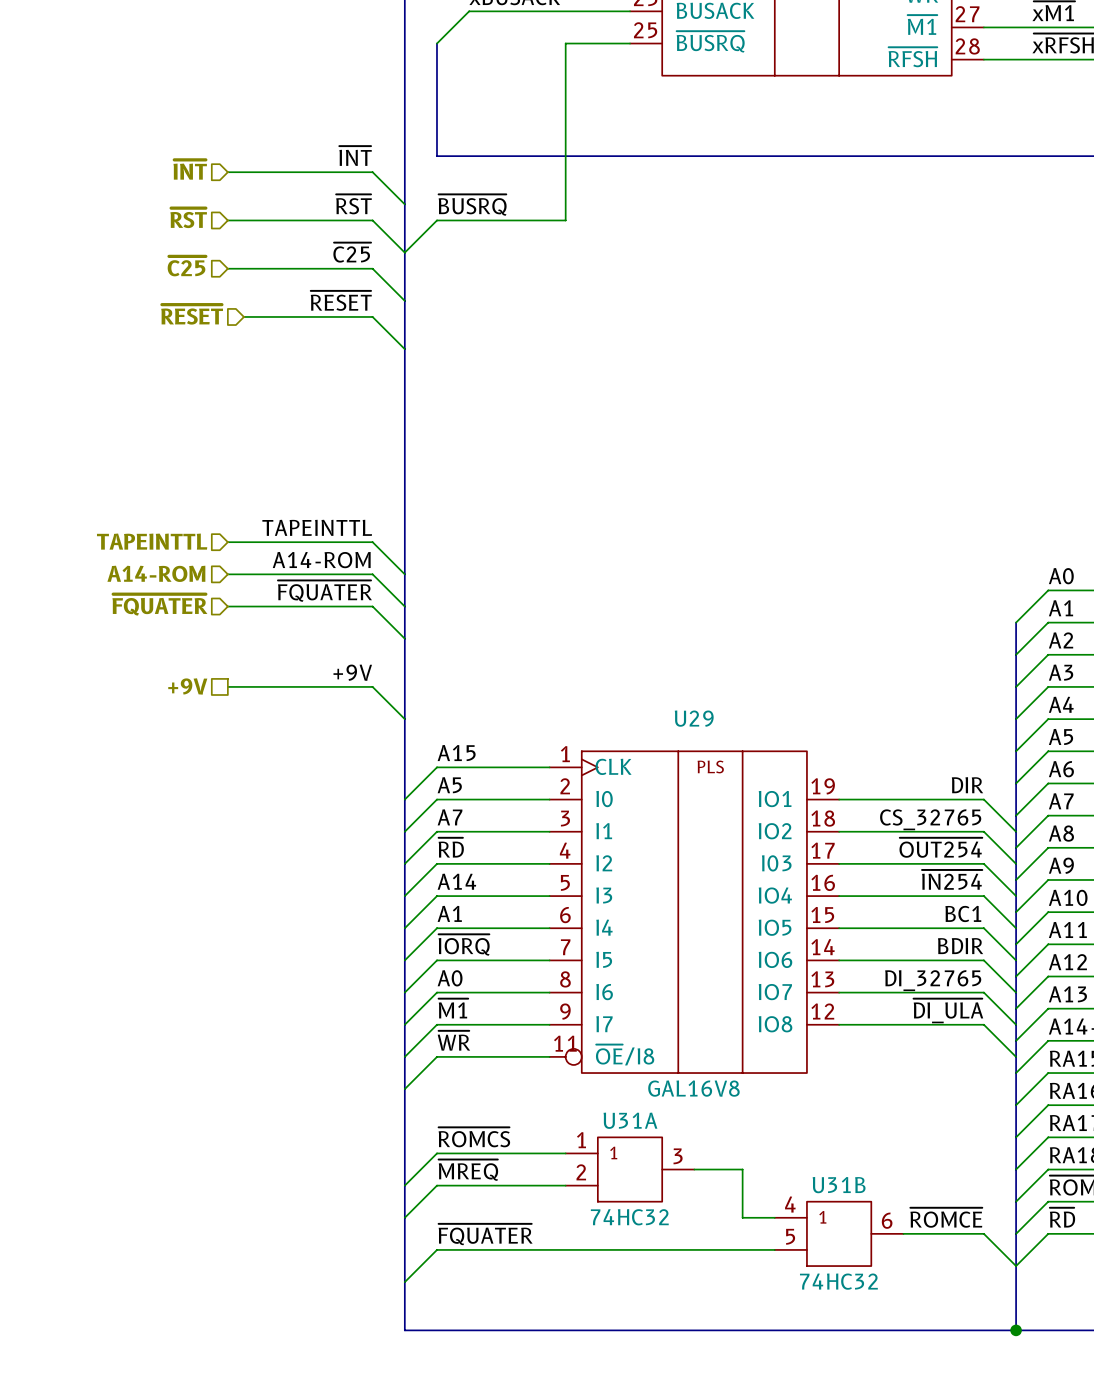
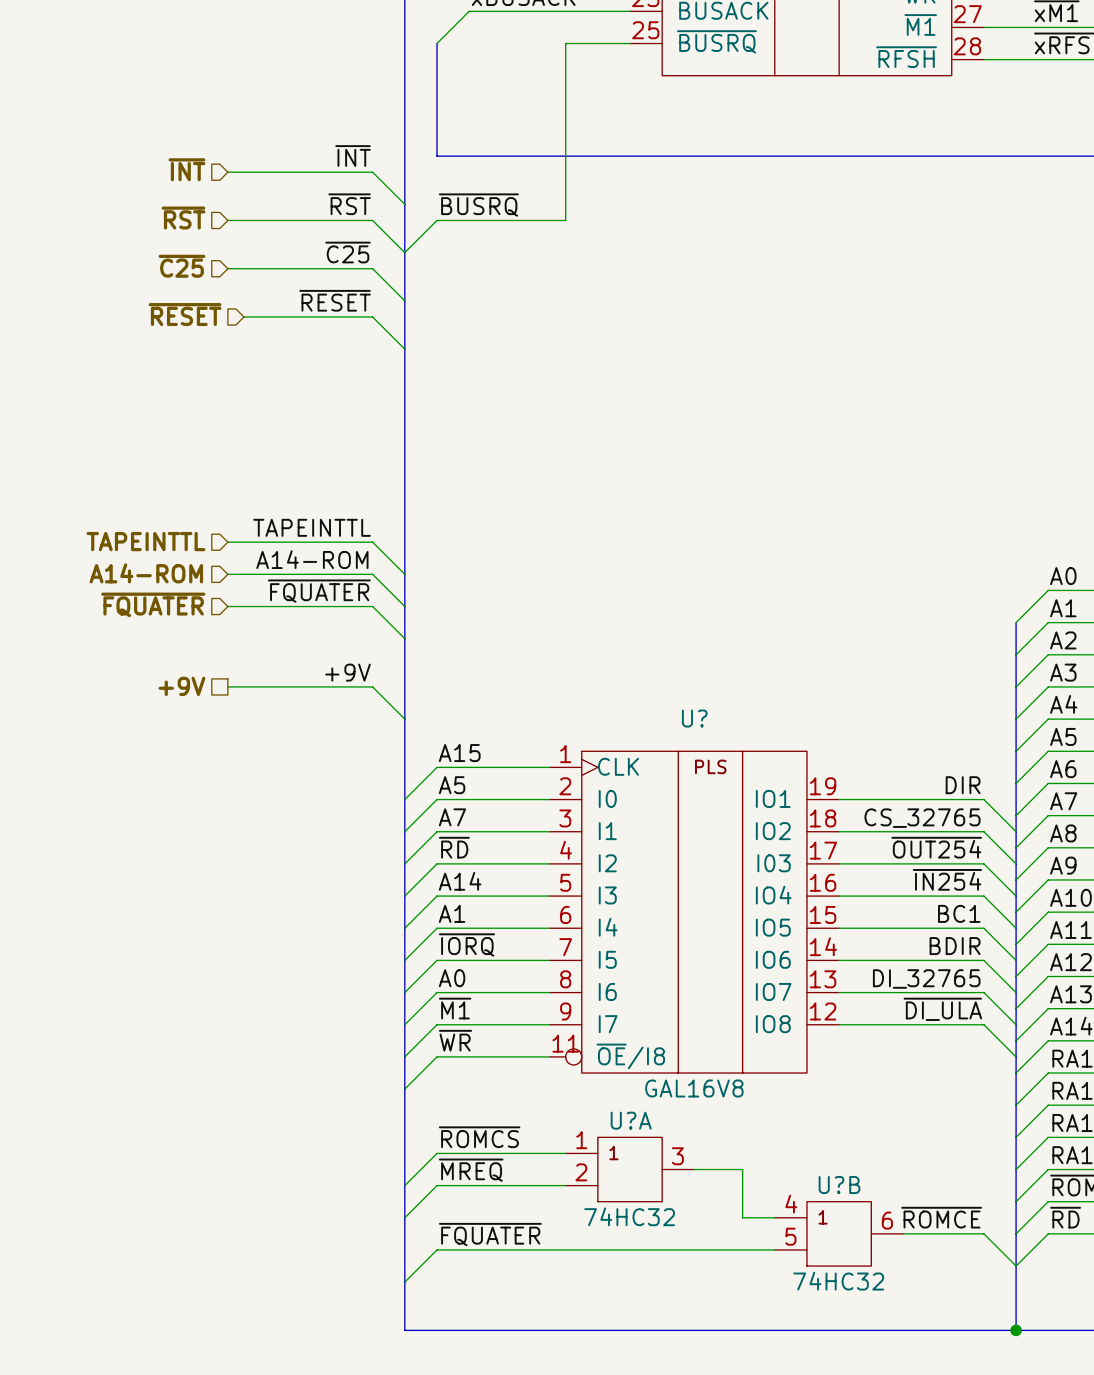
U29 name: U29 (694, 718) -> U? (694, 718)
U31A name: U31A (630, 1120) -> U?A (631, 1120)
U31B name: U31B (839, 1185) -> U?B (839, 1185)

